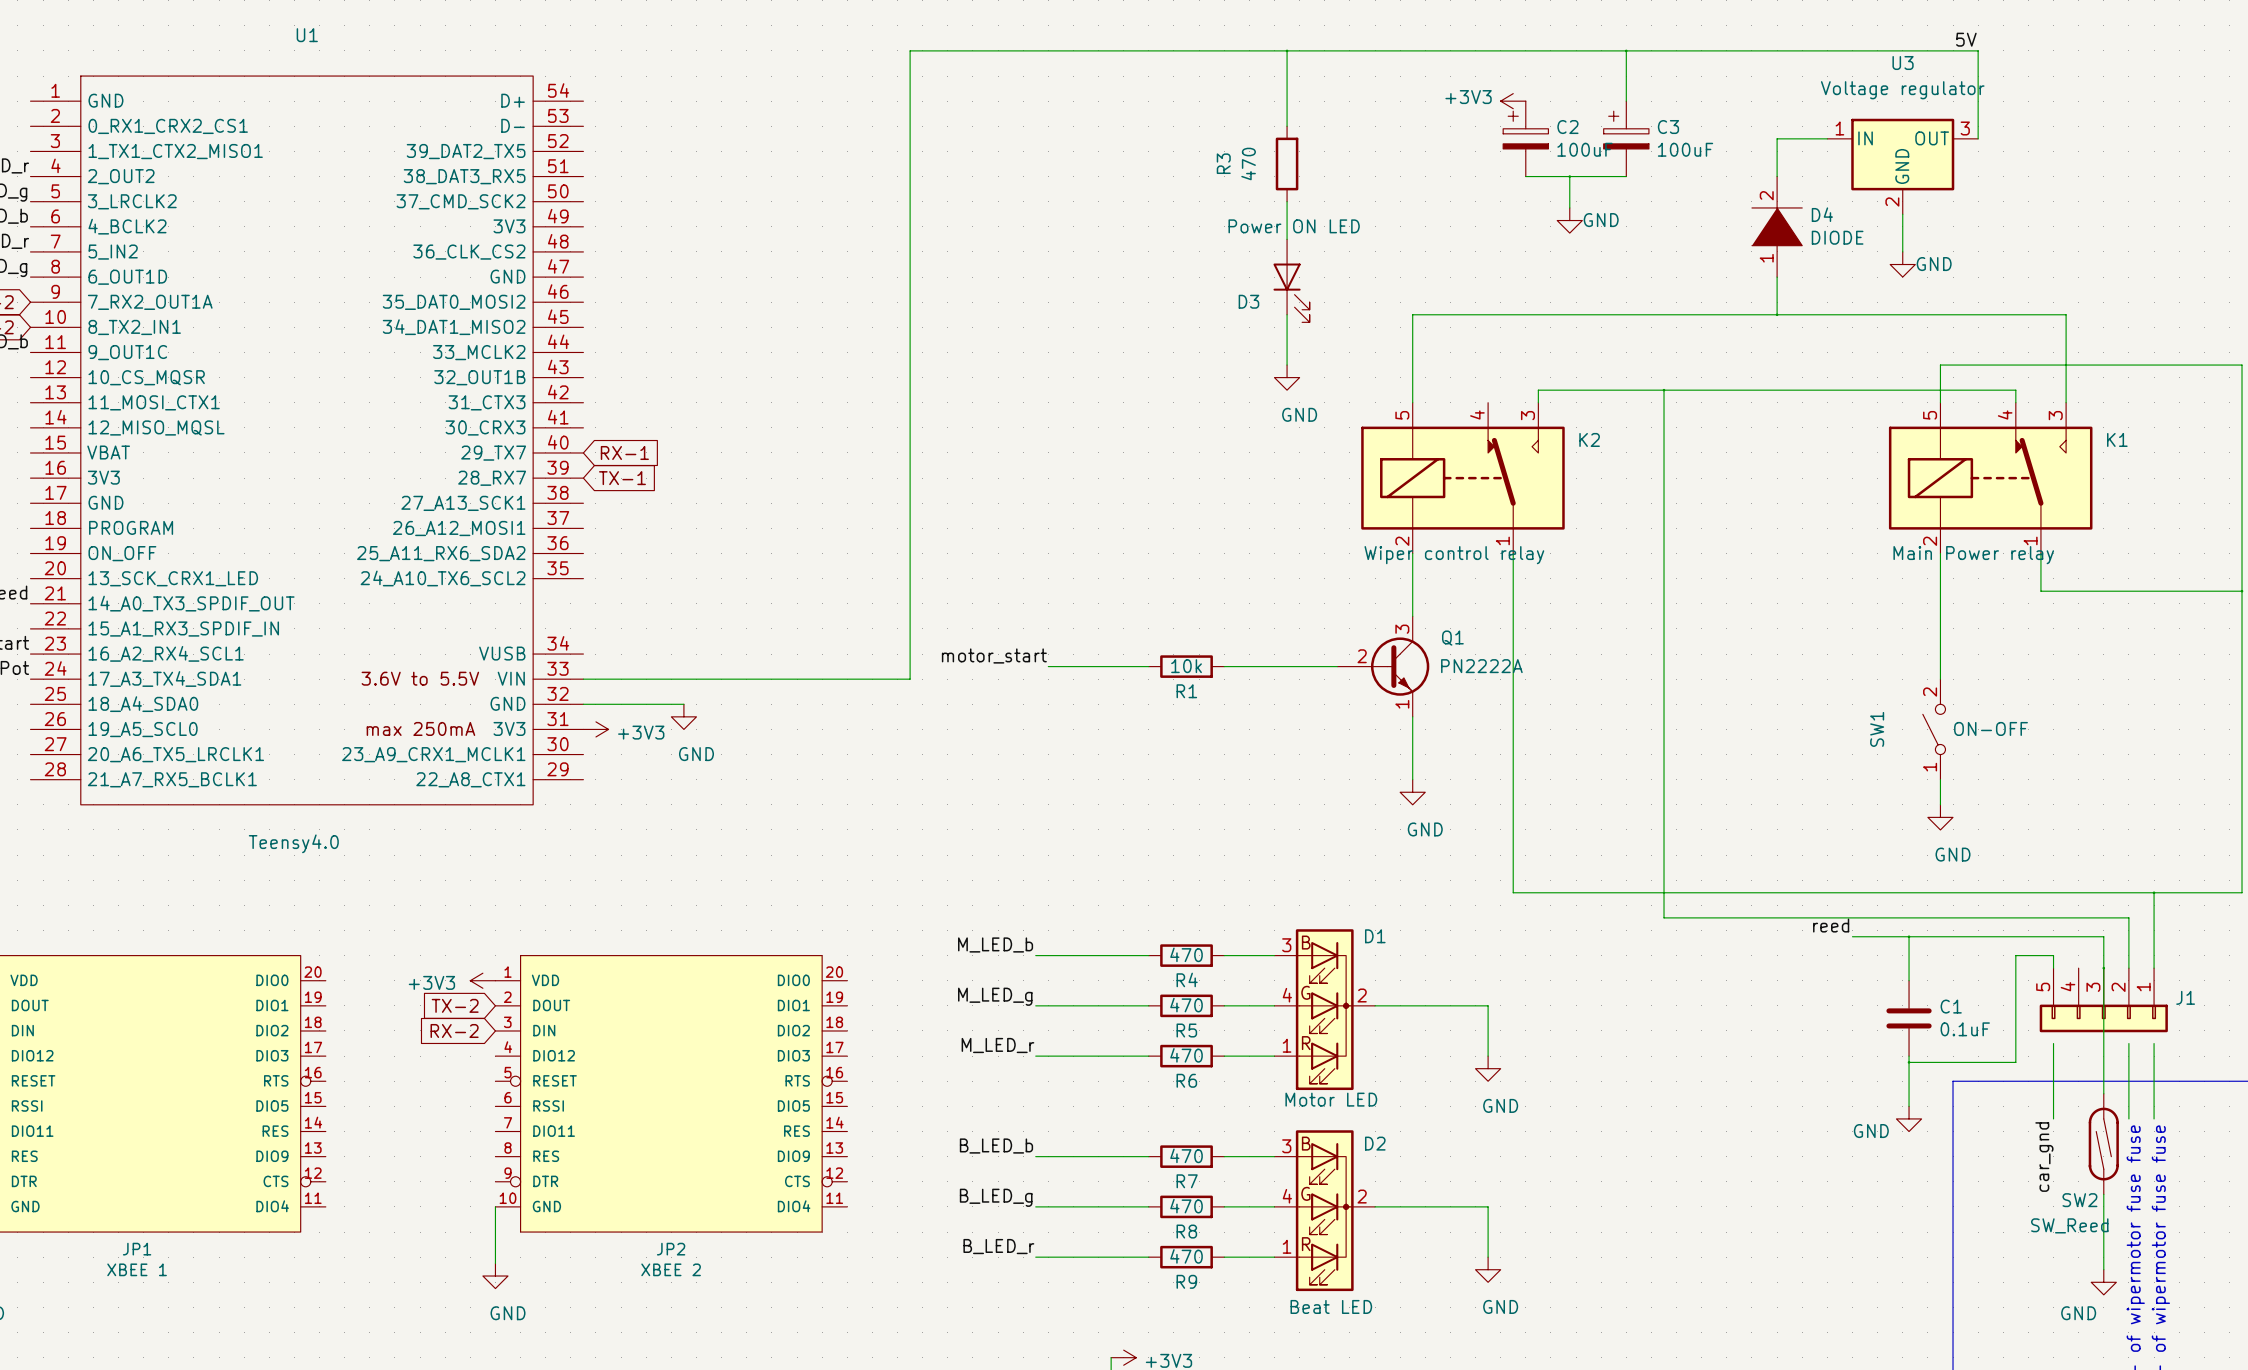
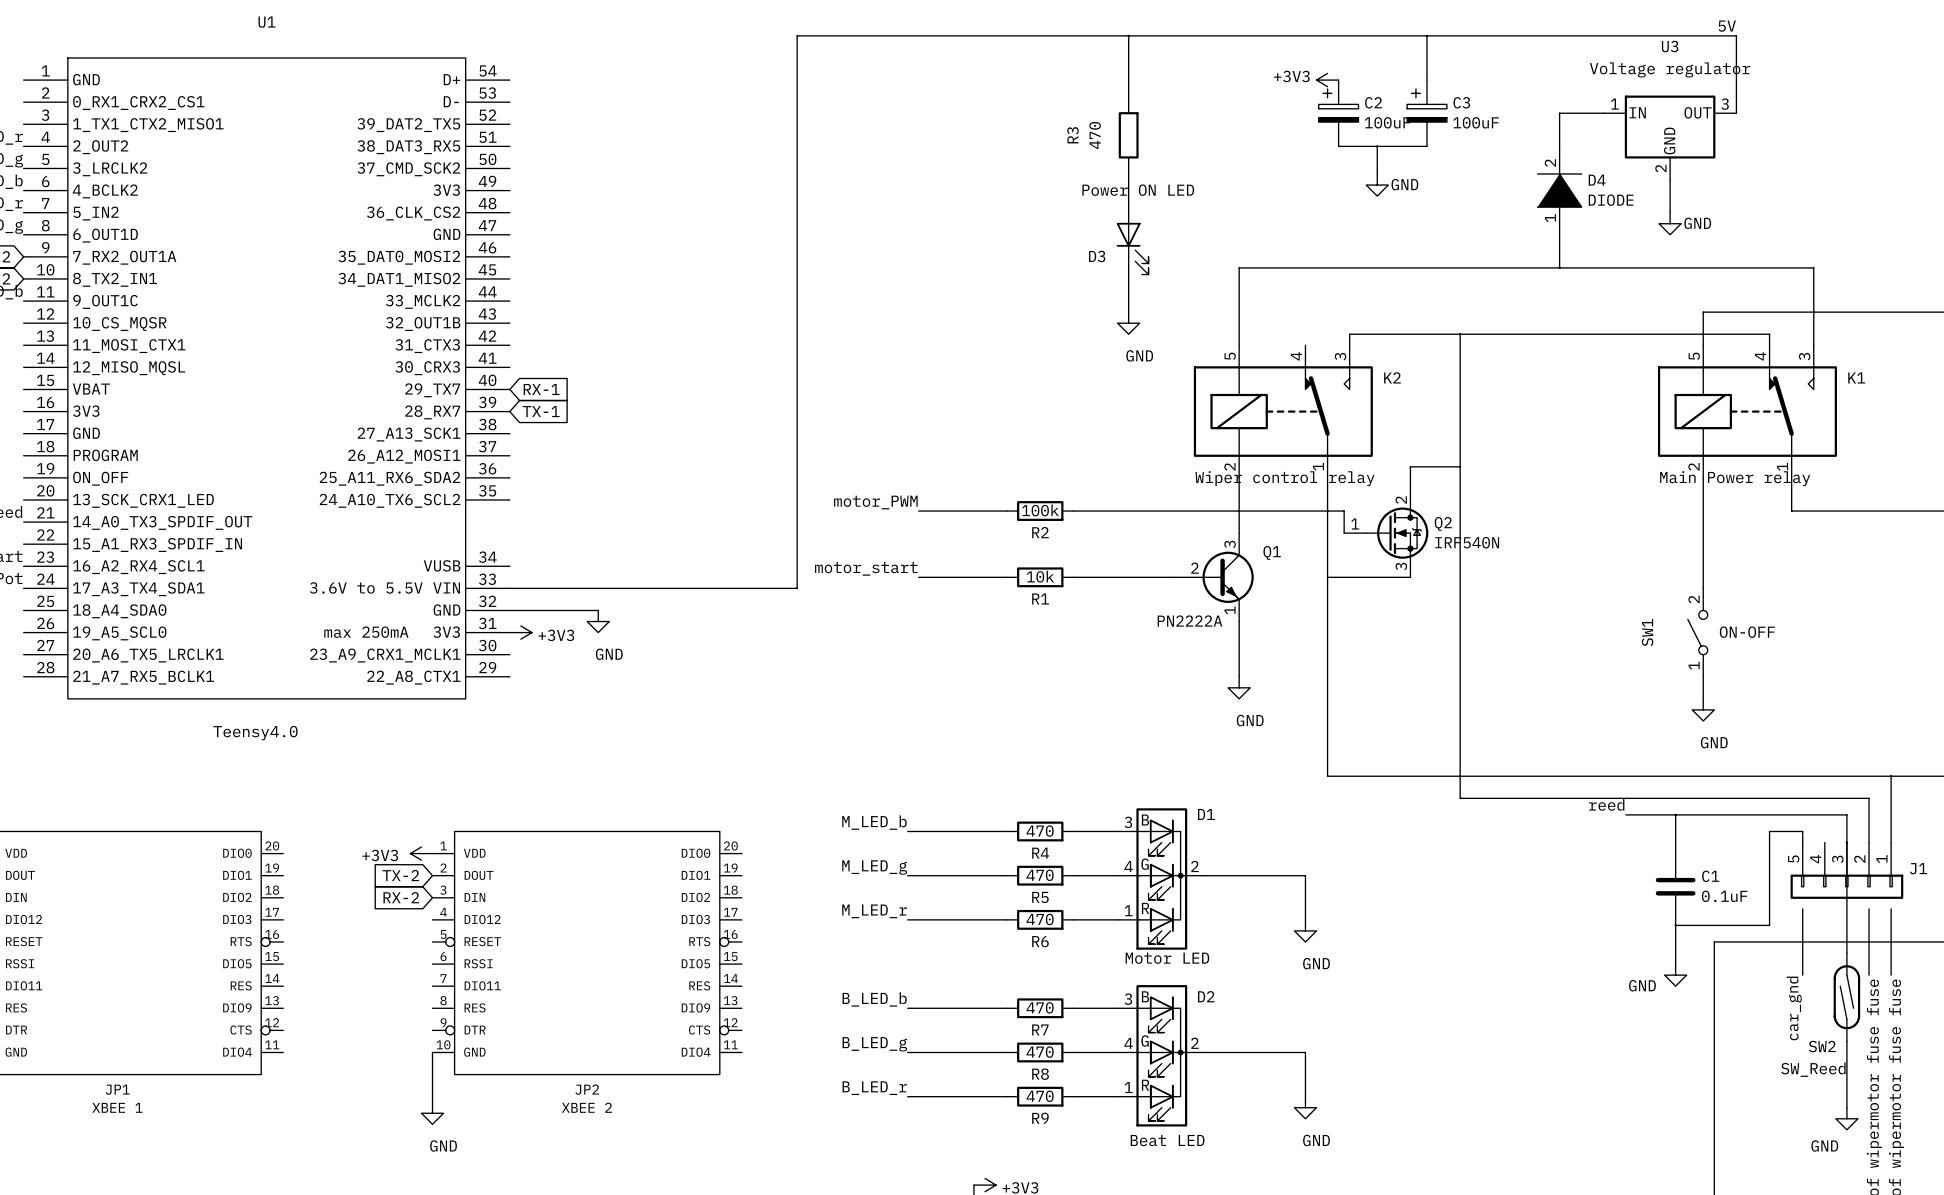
wire: none -> (1460, 466) (1410, 466) (1410, 488)
label: none -> motor_PWM (875, 502)
wire: none -> (918, 511) (1007, 511)
R2: none -> 100k (1040, 511)
wire: none -> (1073, 511) (1344, 511) (1344, 533)
Q2: none -> IRF540N (1386, 533)
Q1 value position: PN2222A (1481, 666) -> PN2222A (1190, 621)
wire: none -> (1327, 577) (1410, 577)

